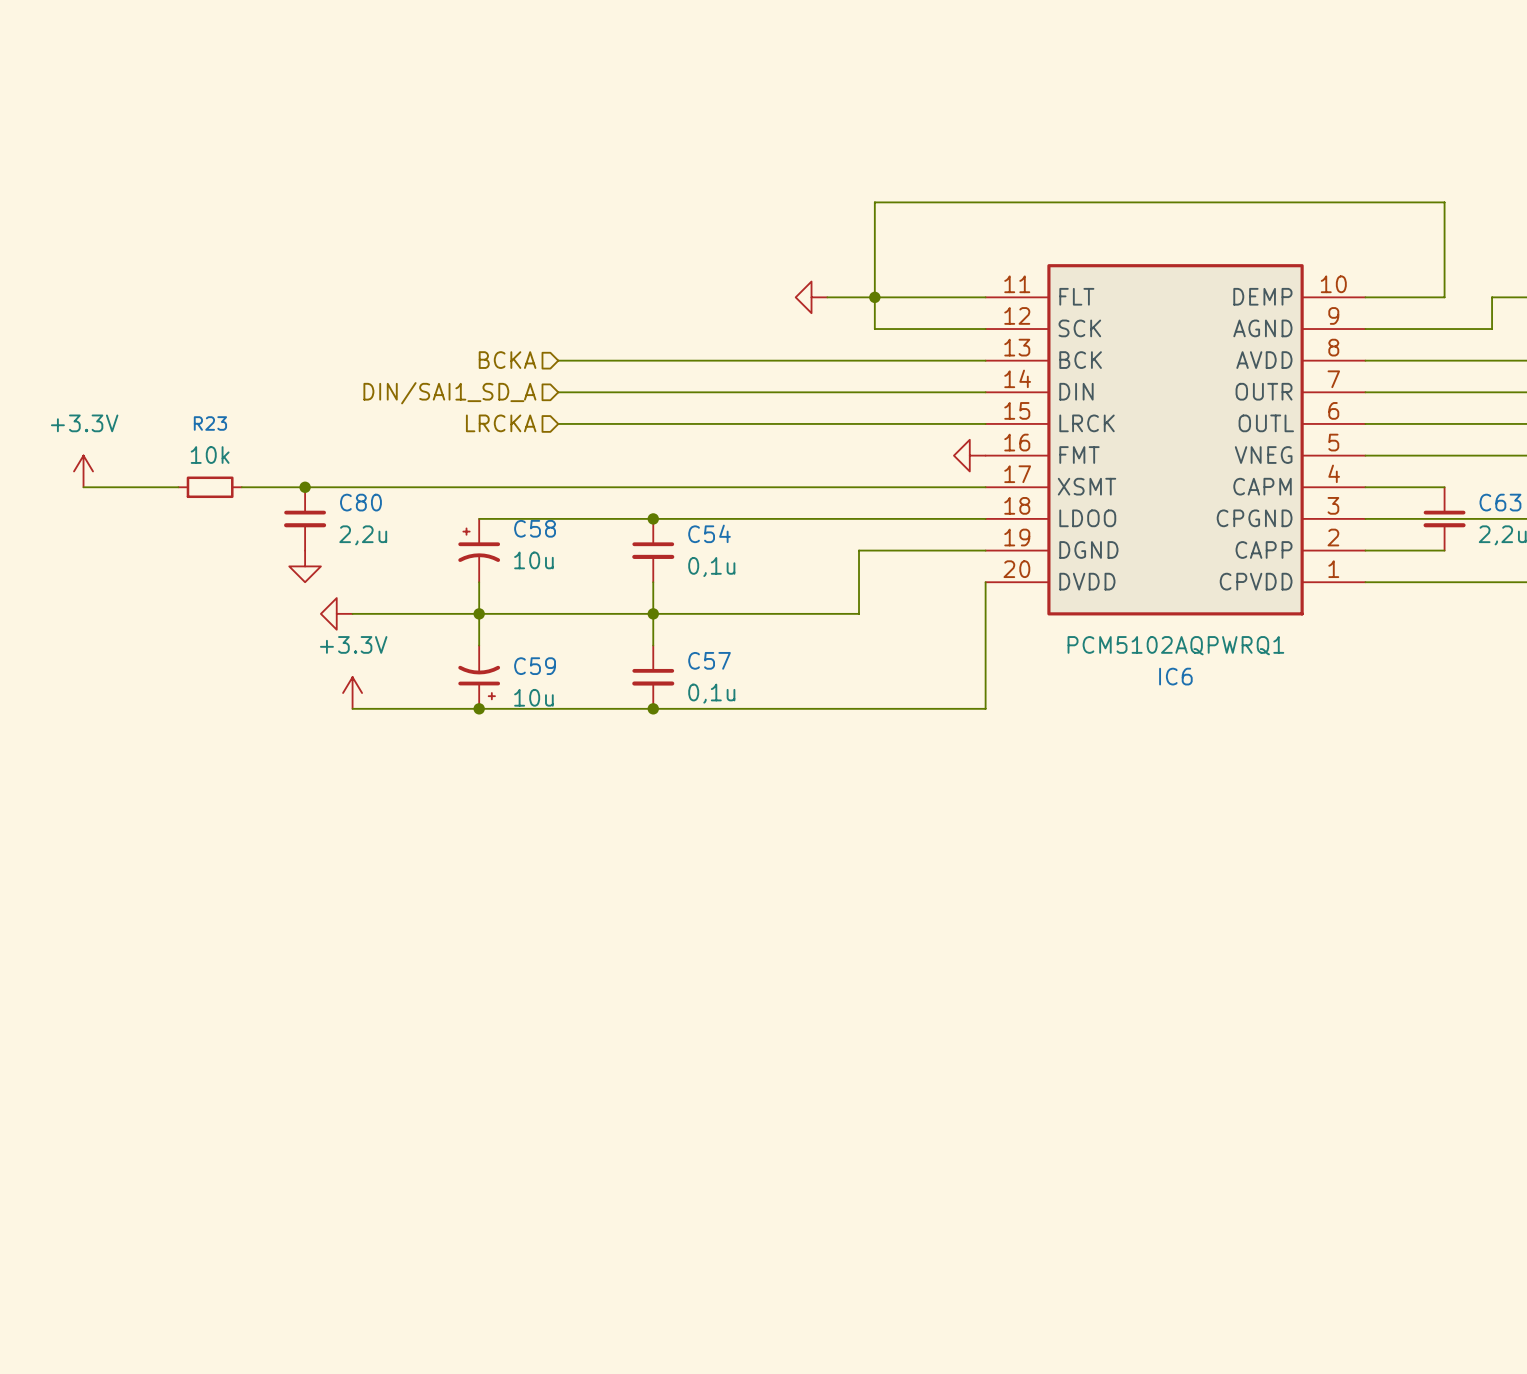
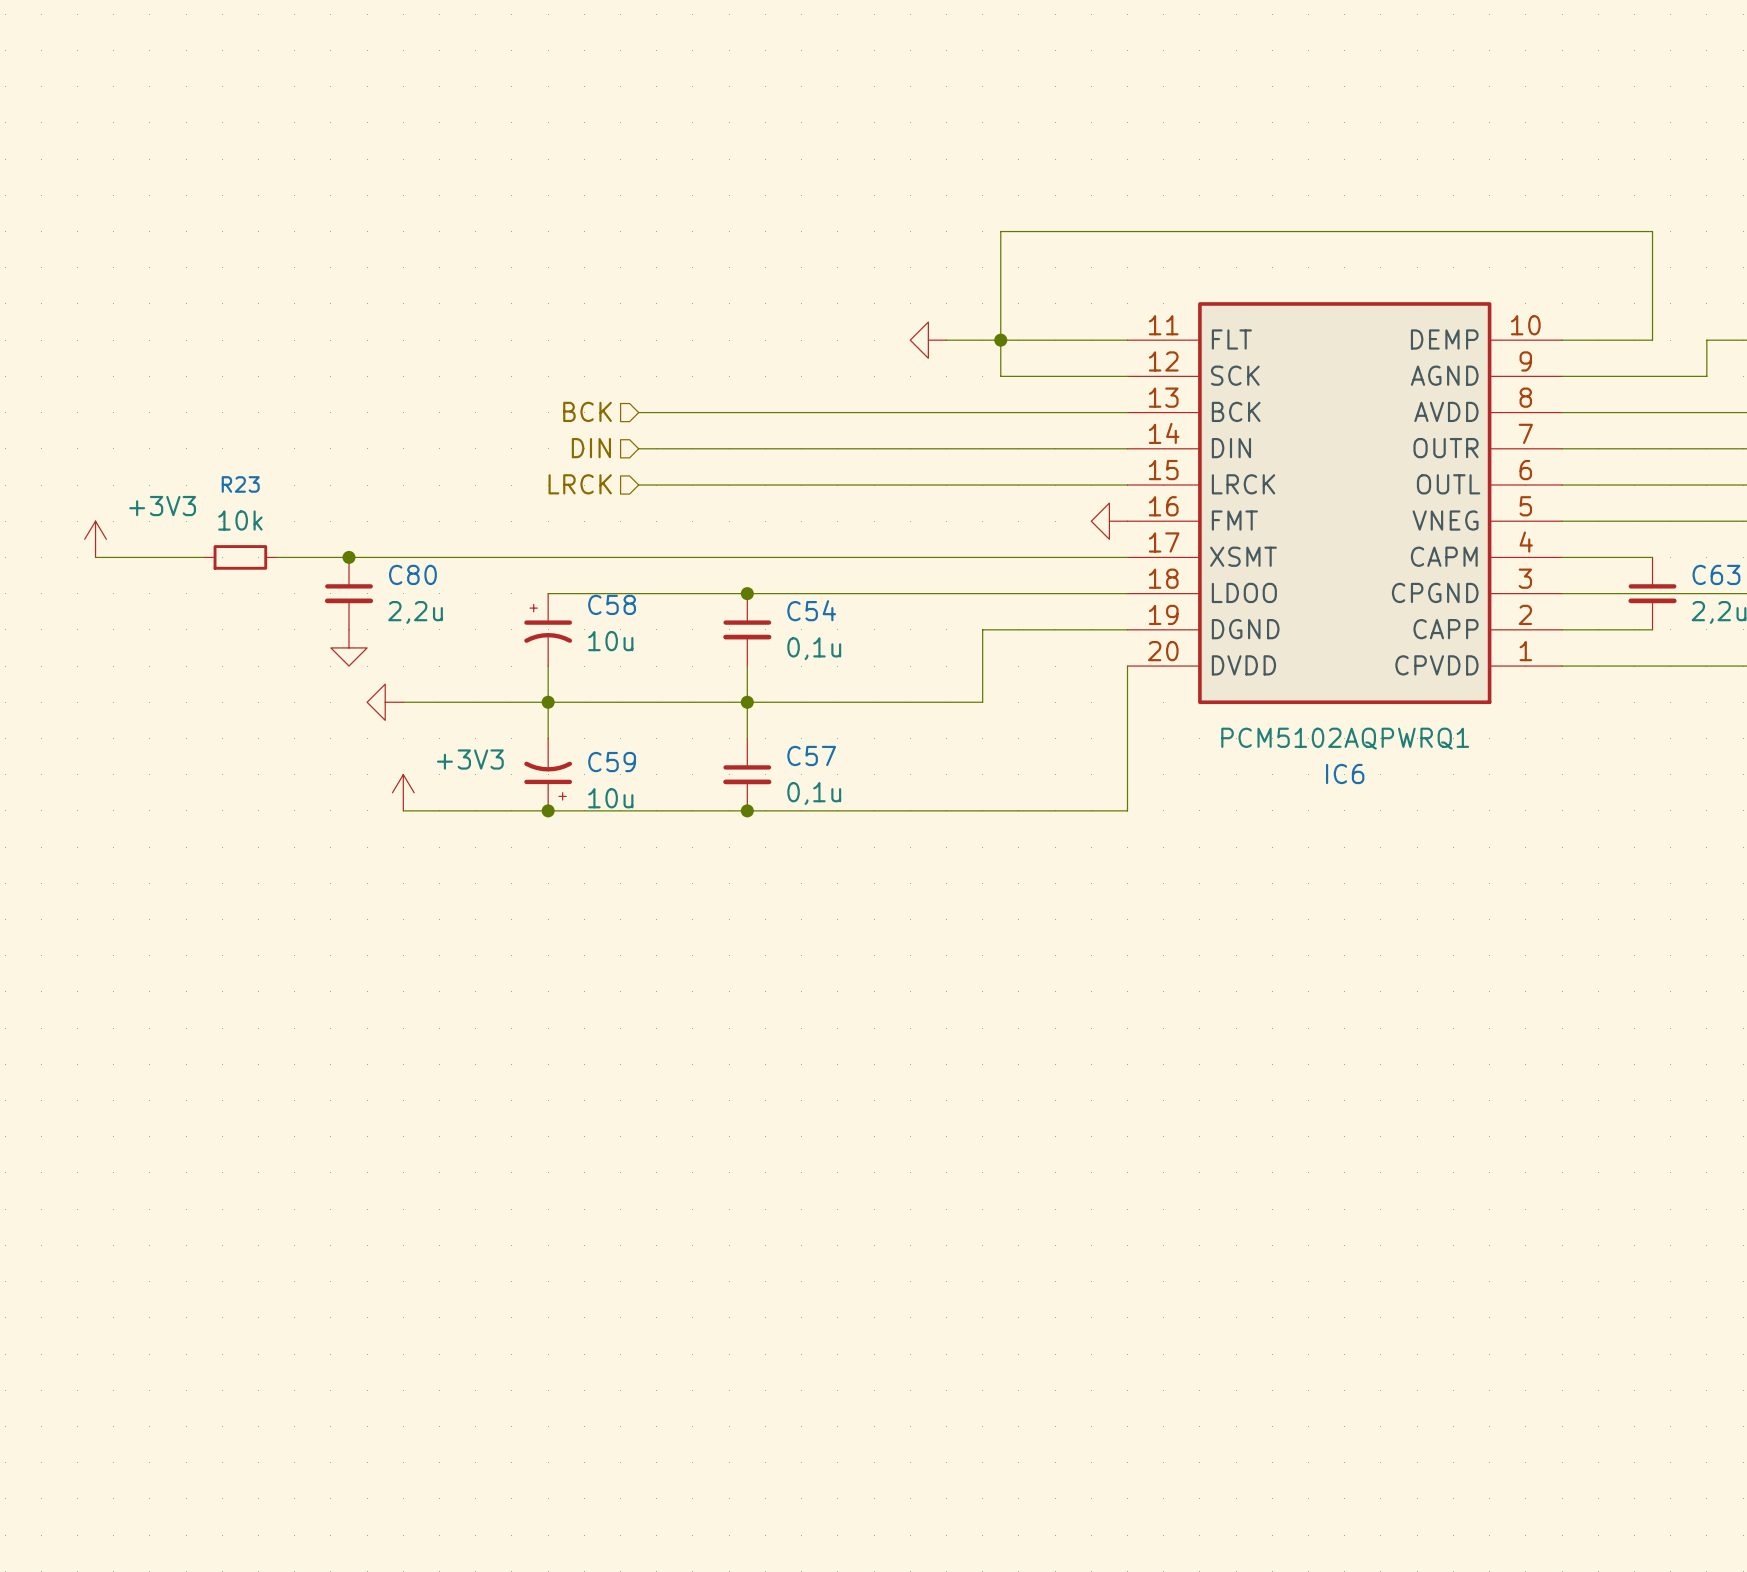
hierarchical label: BCKA (507, 360) -> BCK (587, 411)
hierarchical label: DIN/SAI1_SD_A (449, 393) -> DIN (591, 448)
hierarchical label: LRCKA (501, 423) -> LRCK (580, 484)
power symbol: +3.3V (83, 471) -> +3V3 (95, 539)
power symbol: +3.3V (352, 693) -> +3V3 (403, 792)

